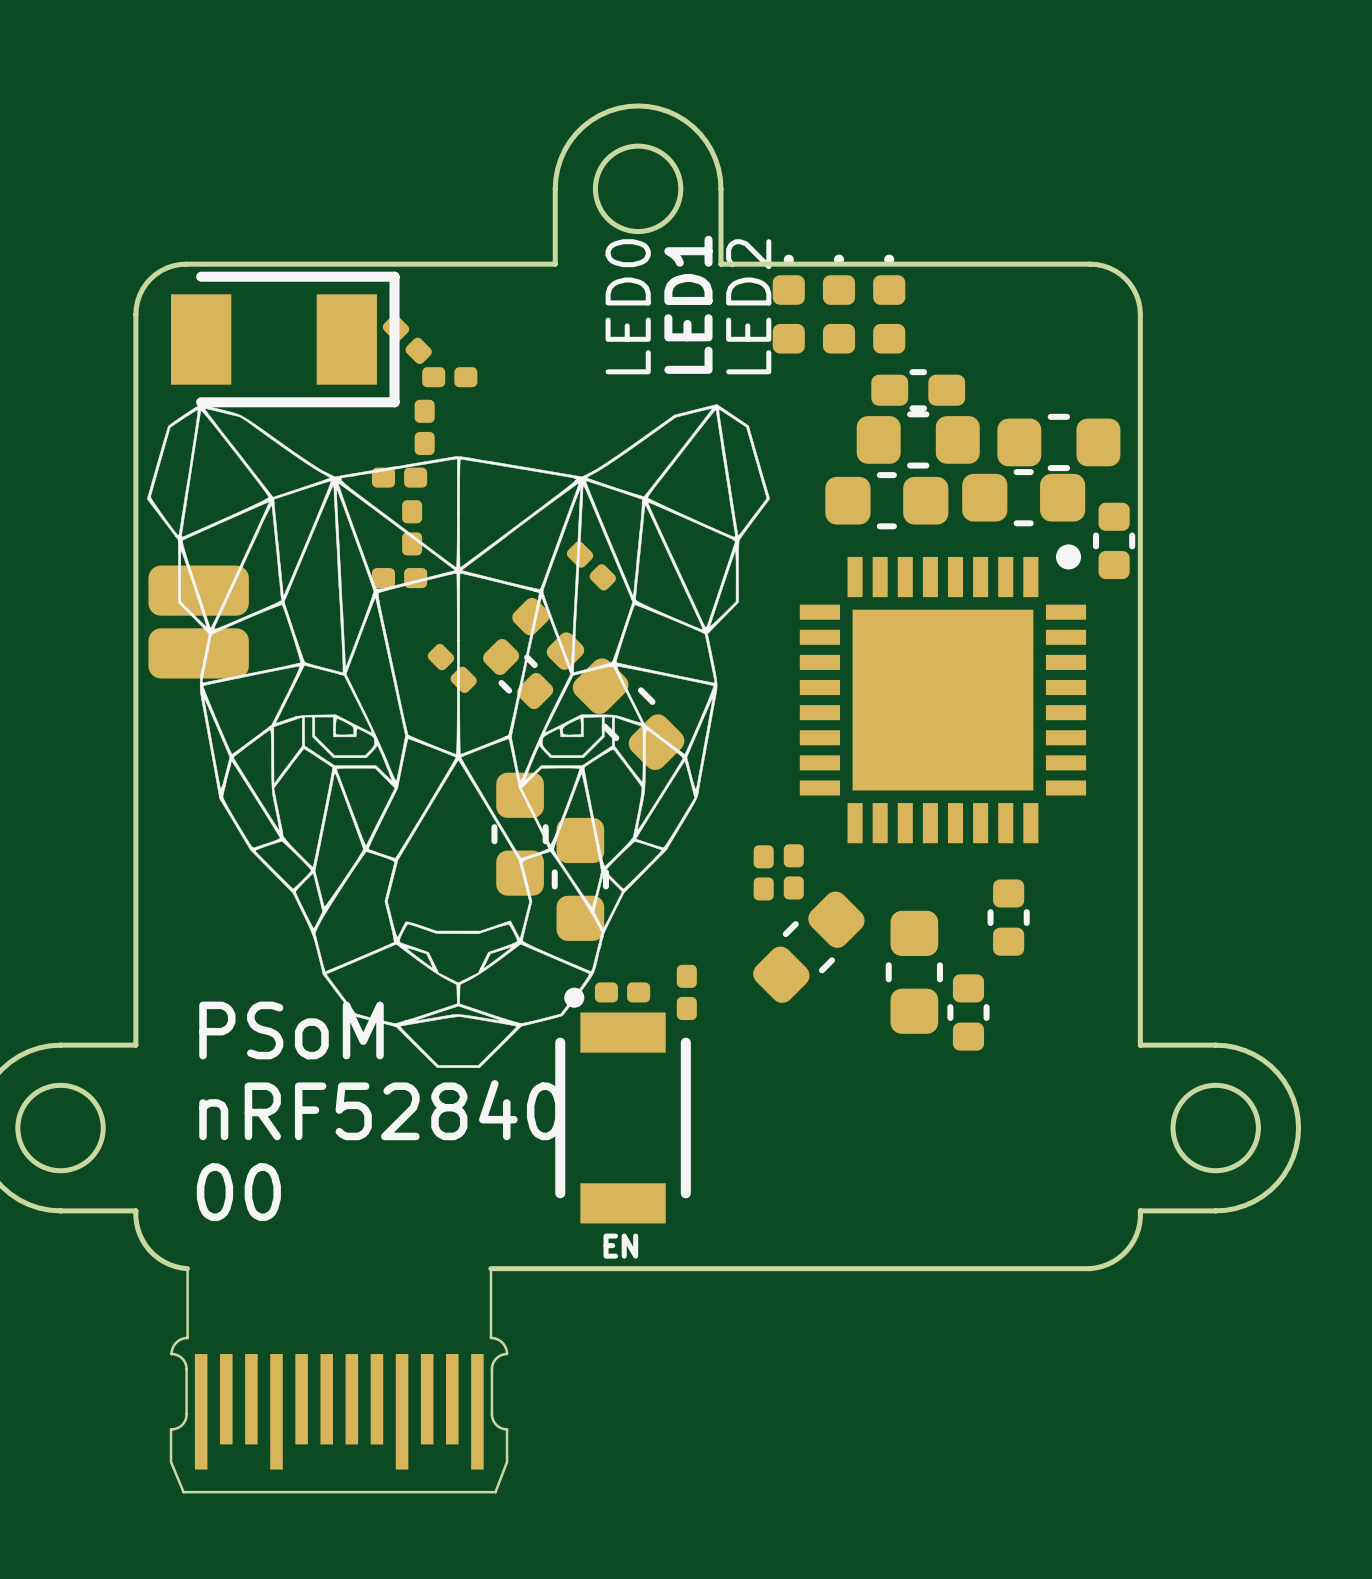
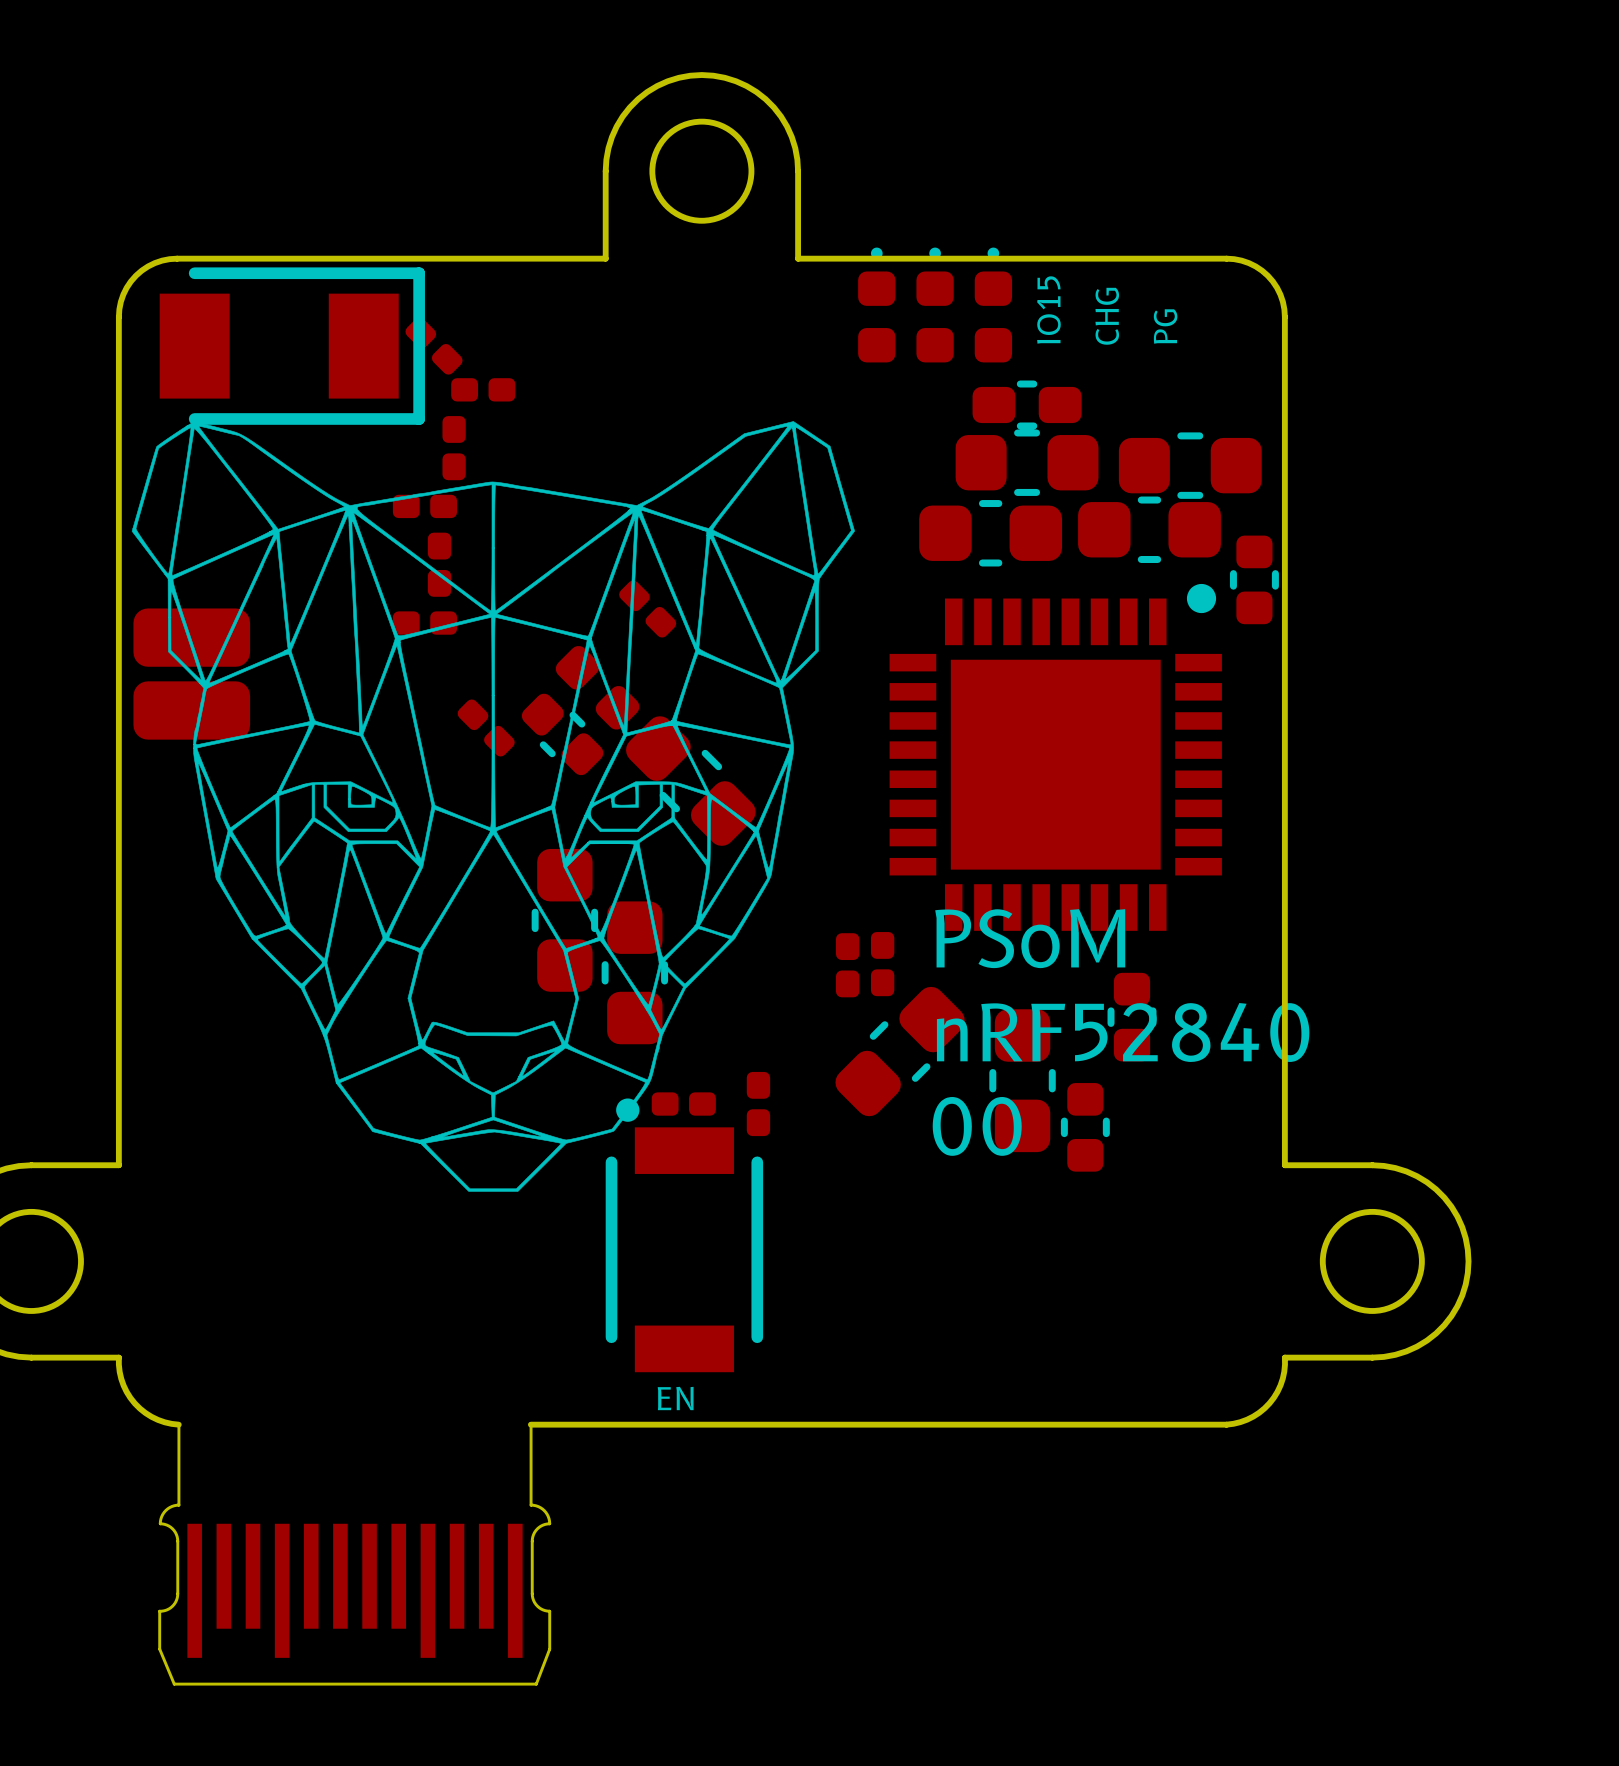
text: none -> IO15 (1048, 309)
text: LED1 (688, 304) -> none
text: none -> CHG (1107, 316)
text: LED0 (628, 306) -> none
text: LED2 (748, 306) -> none
text: none -> PG (1165, 326)
text position: PSoM (291, 1030) -> PSoM (1030, 938)
text position: nRF52840 (381, 1110) -> nRF52840 (1123, 1032)
text position: 00 (238, 1192) -> 00 (977, 1126)

